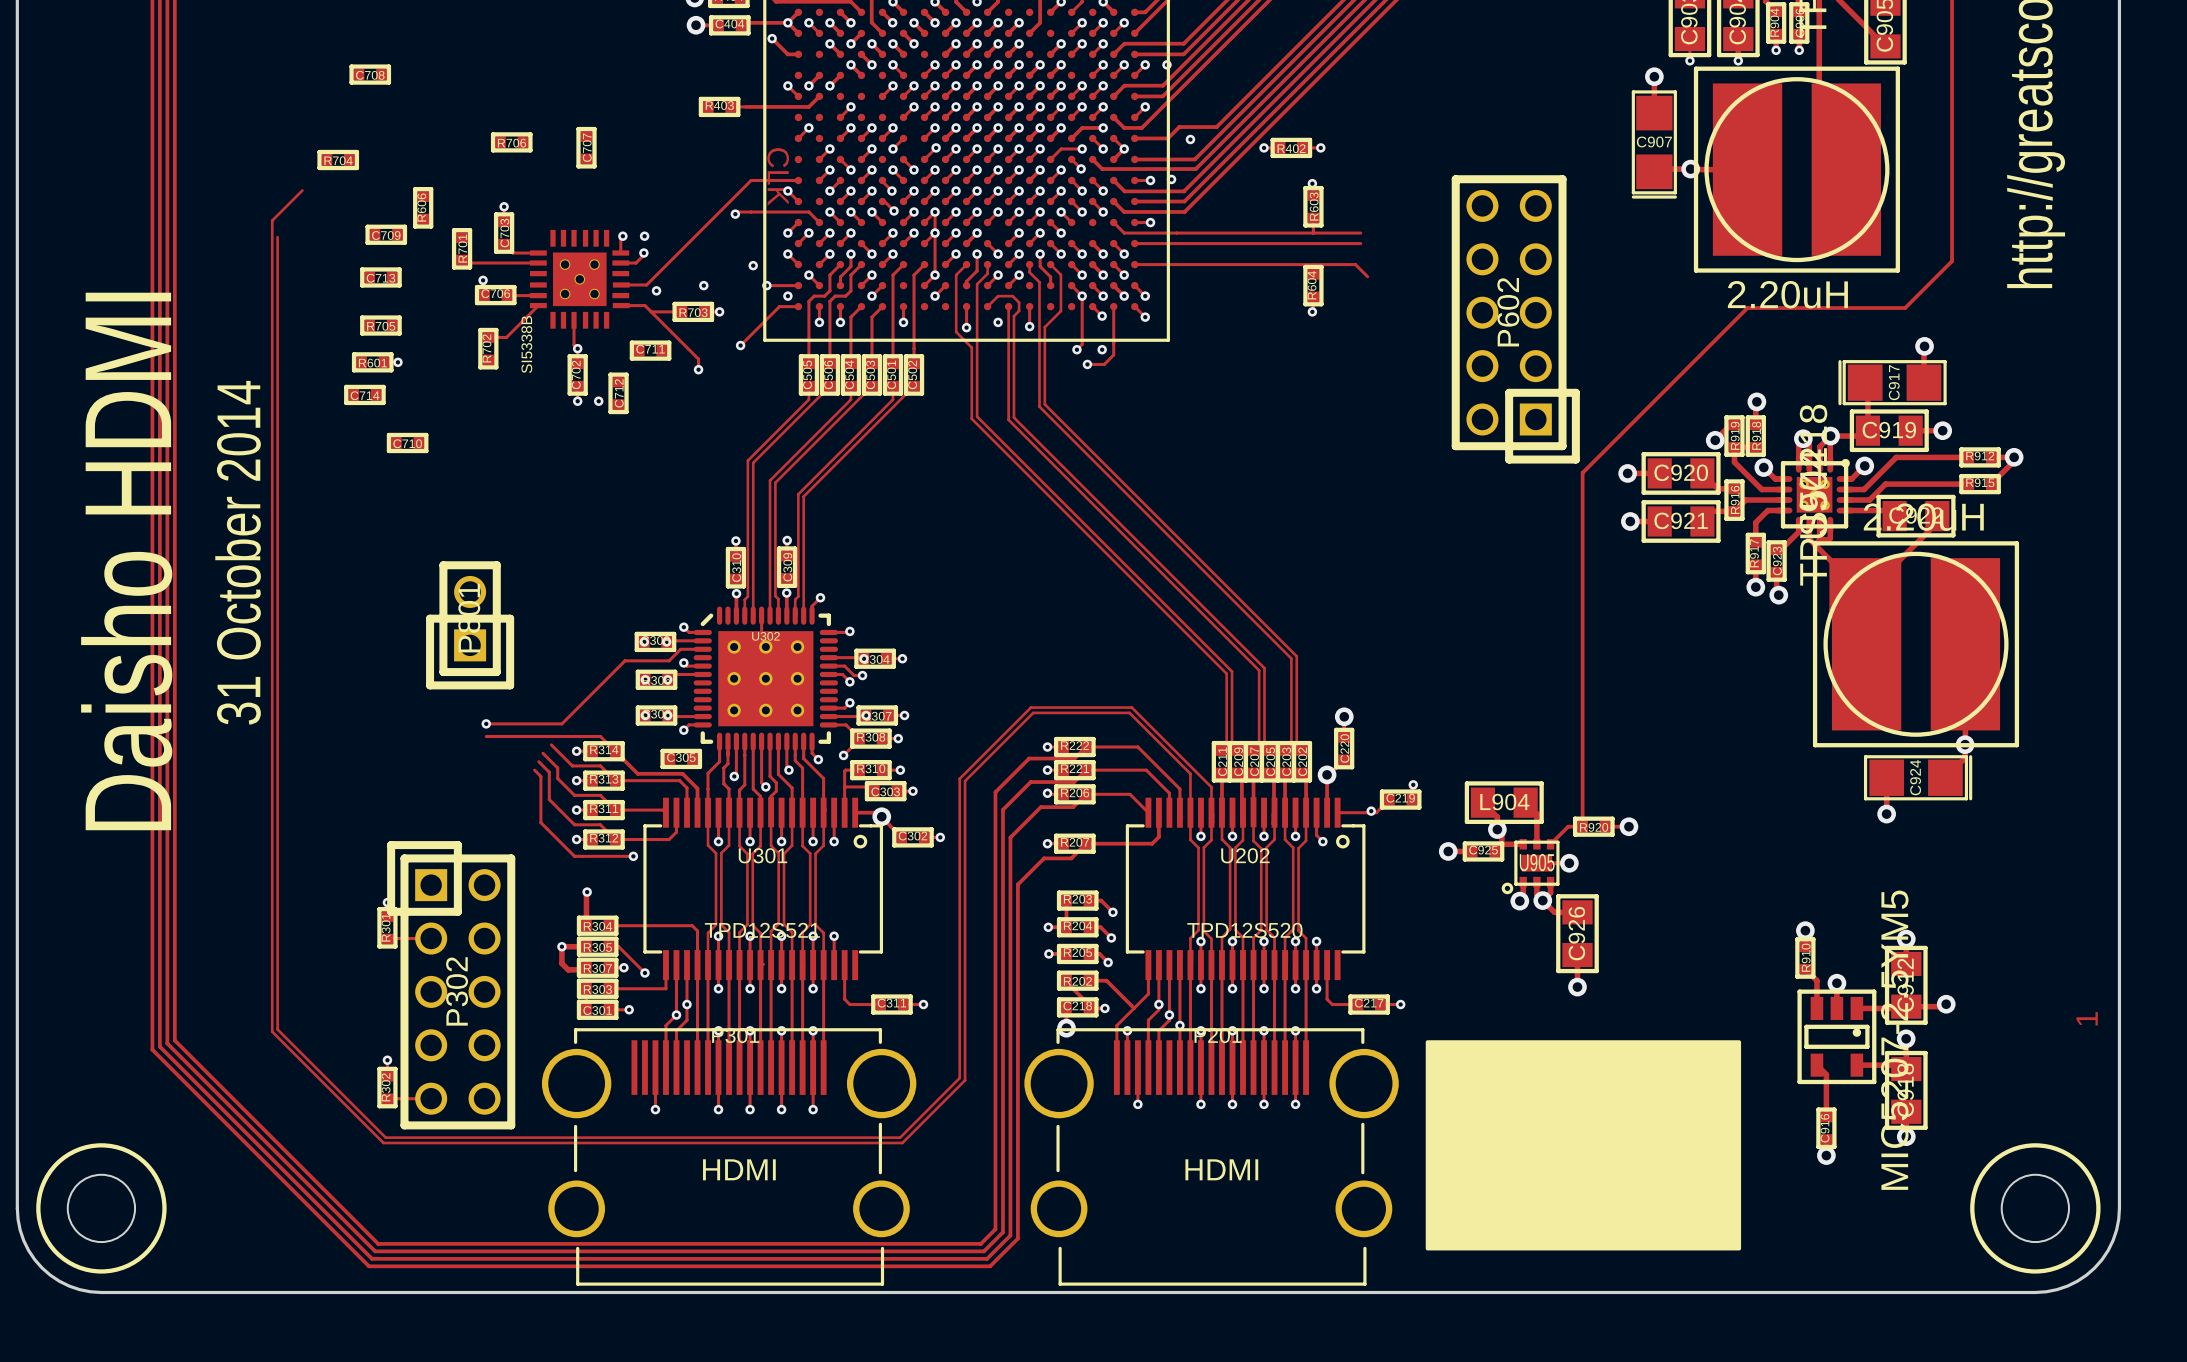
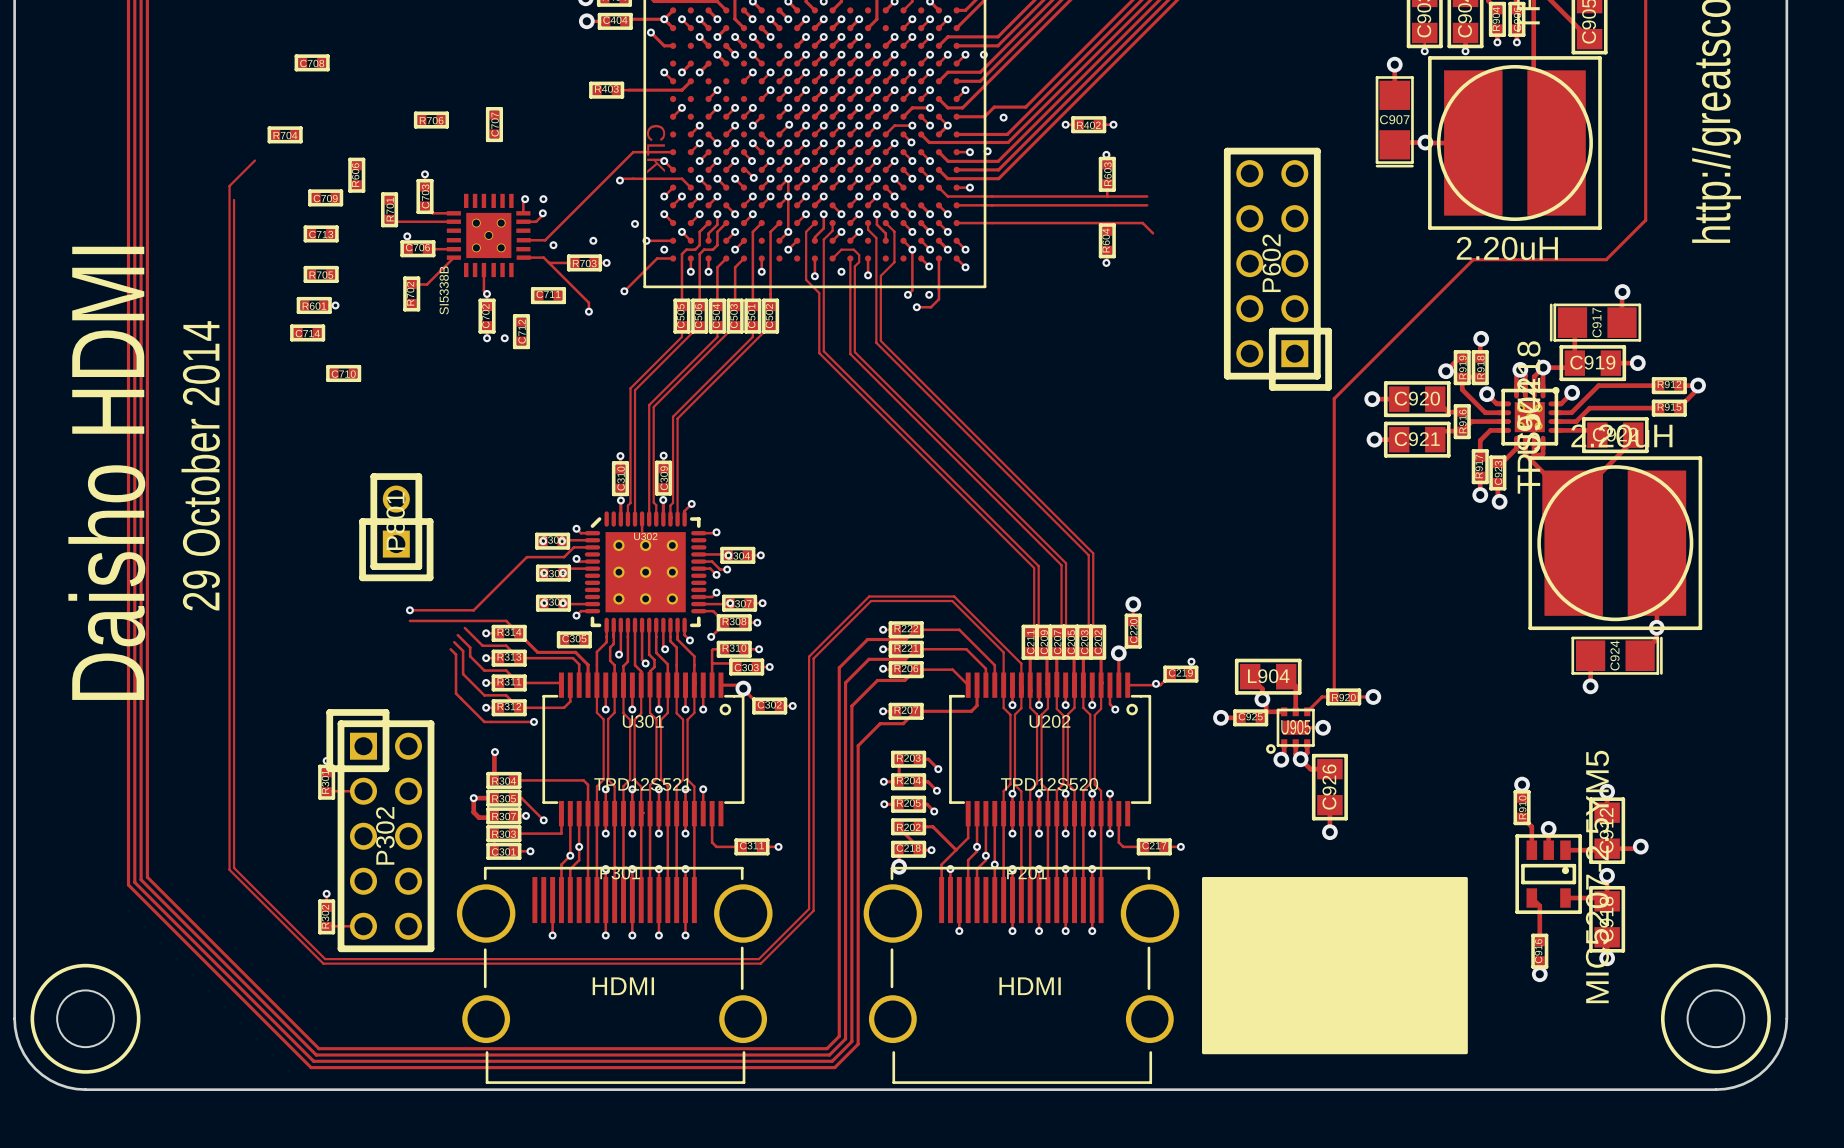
text: 31 October 2014 (238, 552) -> 29 October 2014 (200, 465)
text: 1 (2087, 1018) -> none

